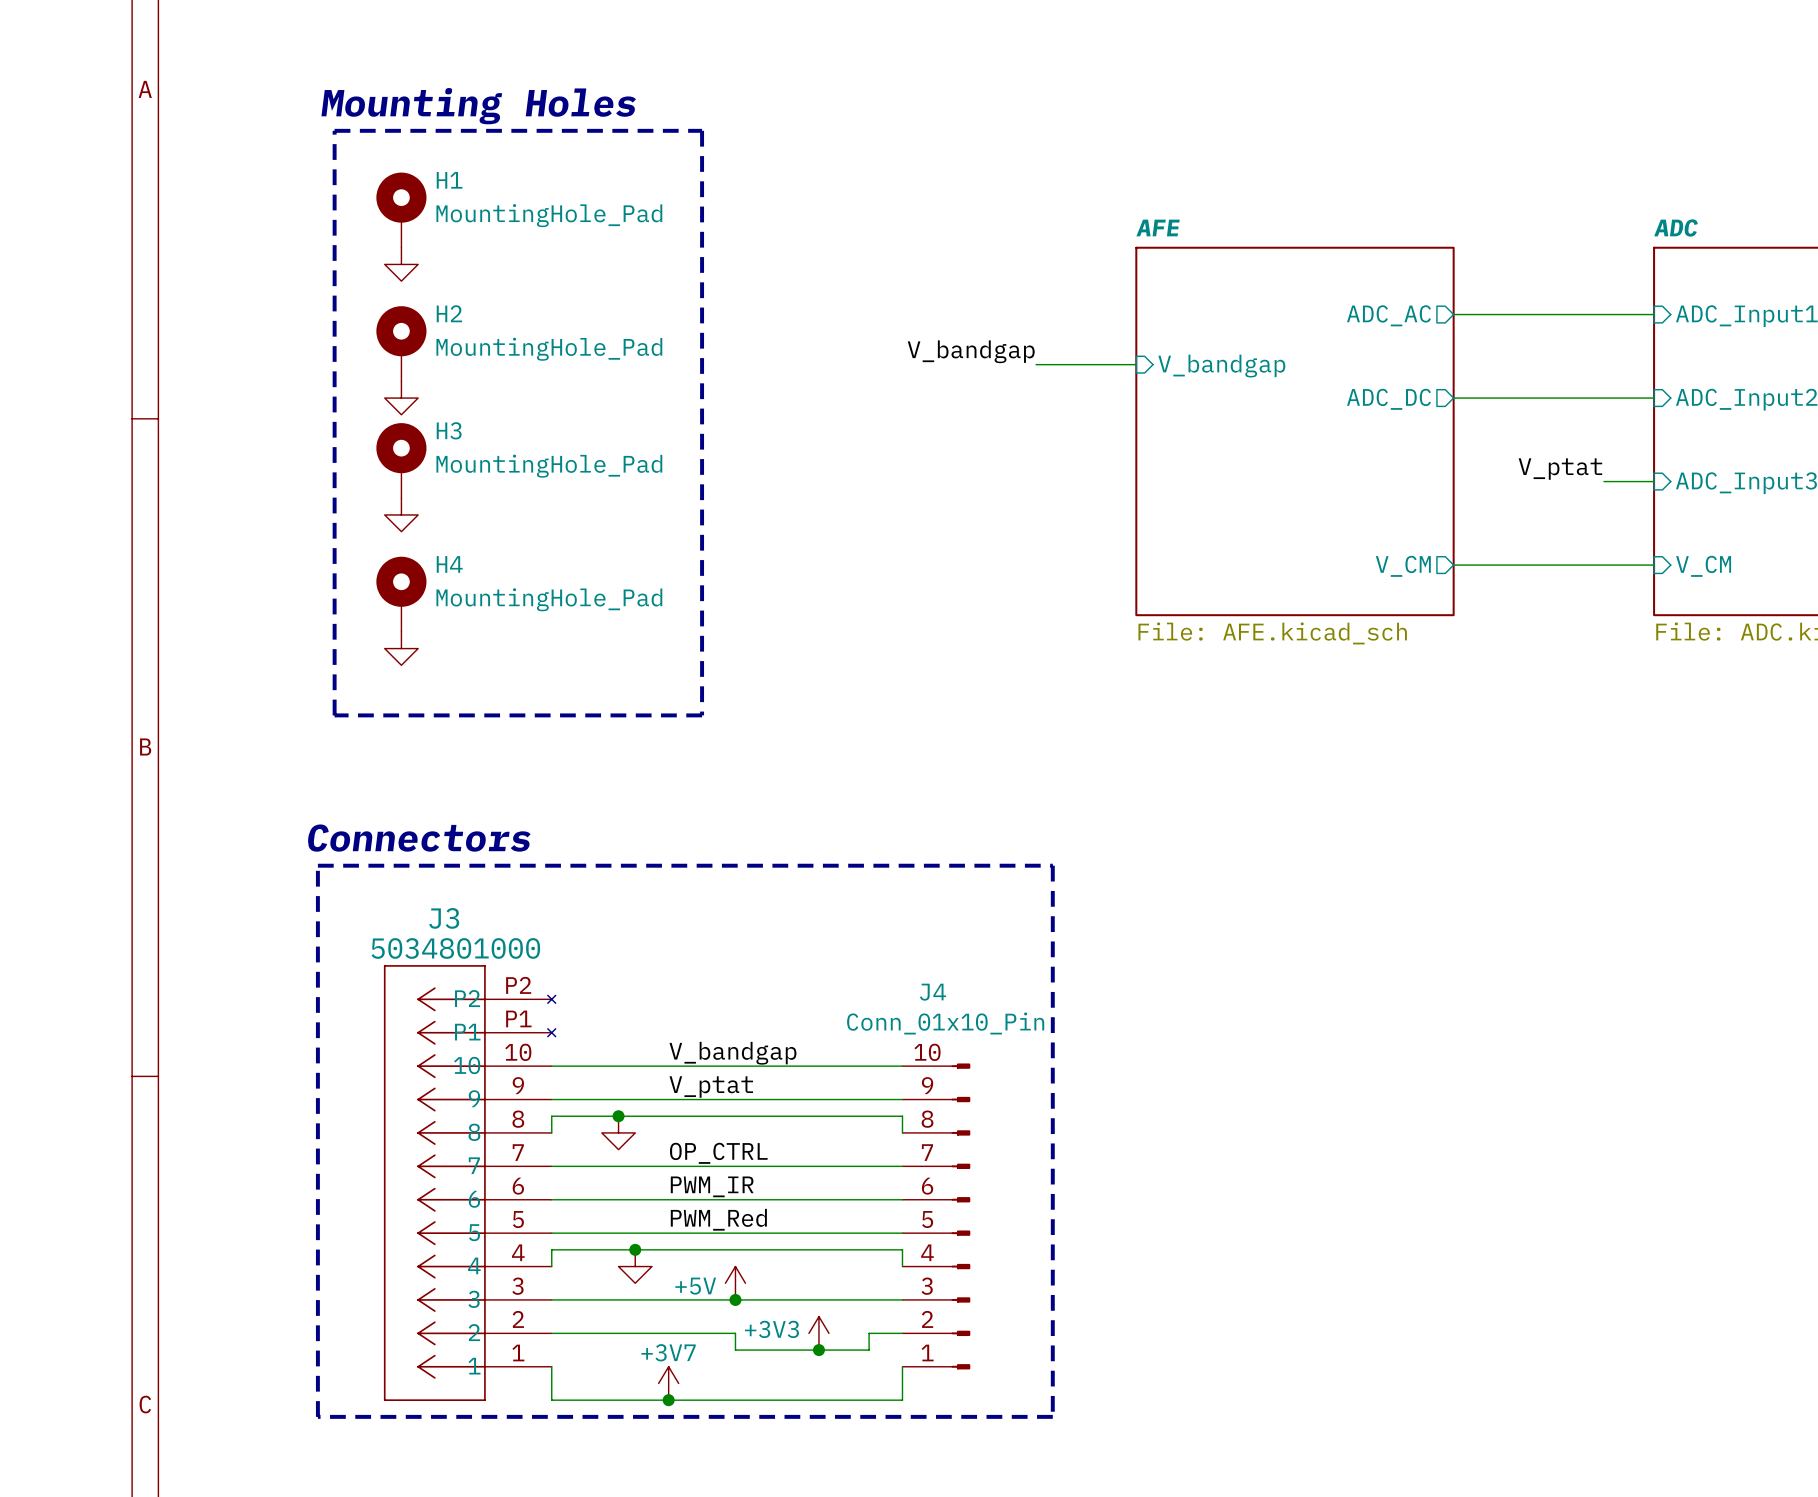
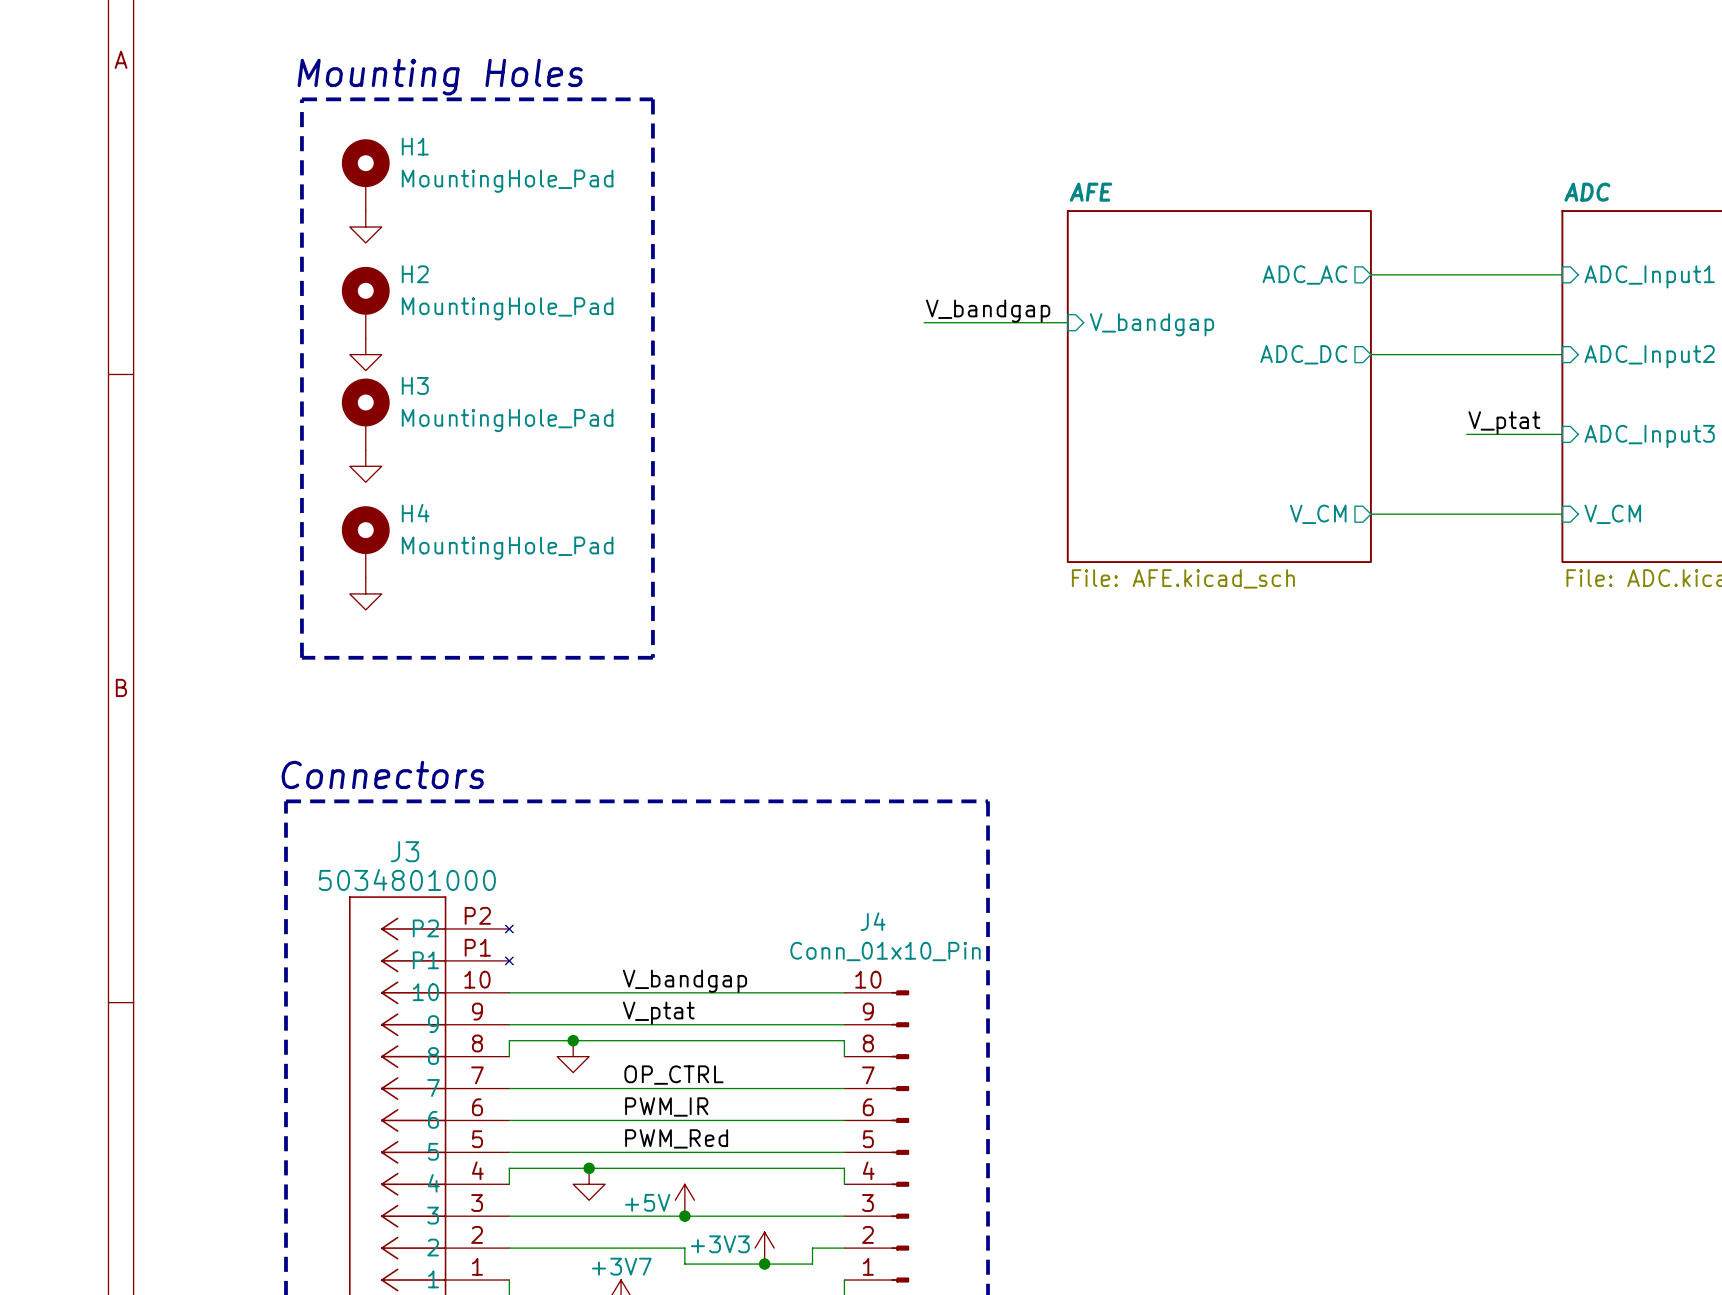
label position: V_bandgap (971, 351) -> V_bandgap (988, 311)
wire: none -> (924, 322) (972, 322)
label position: V_ptat (1560, 469) -> V_ptat (1504, 422)
wire: none -> (1466, 434) (1514, 434)

